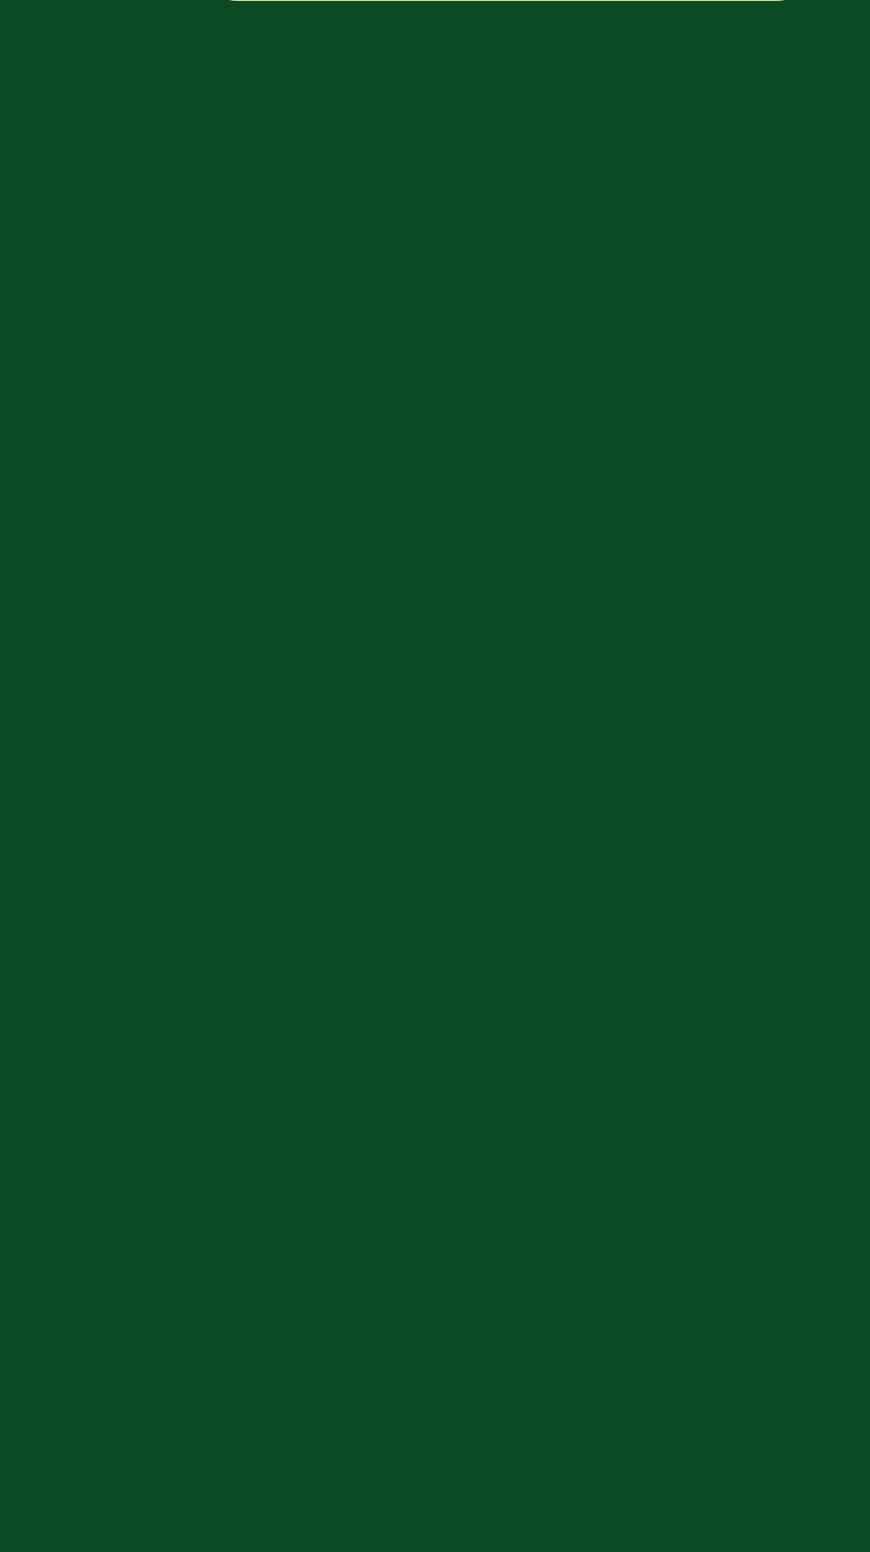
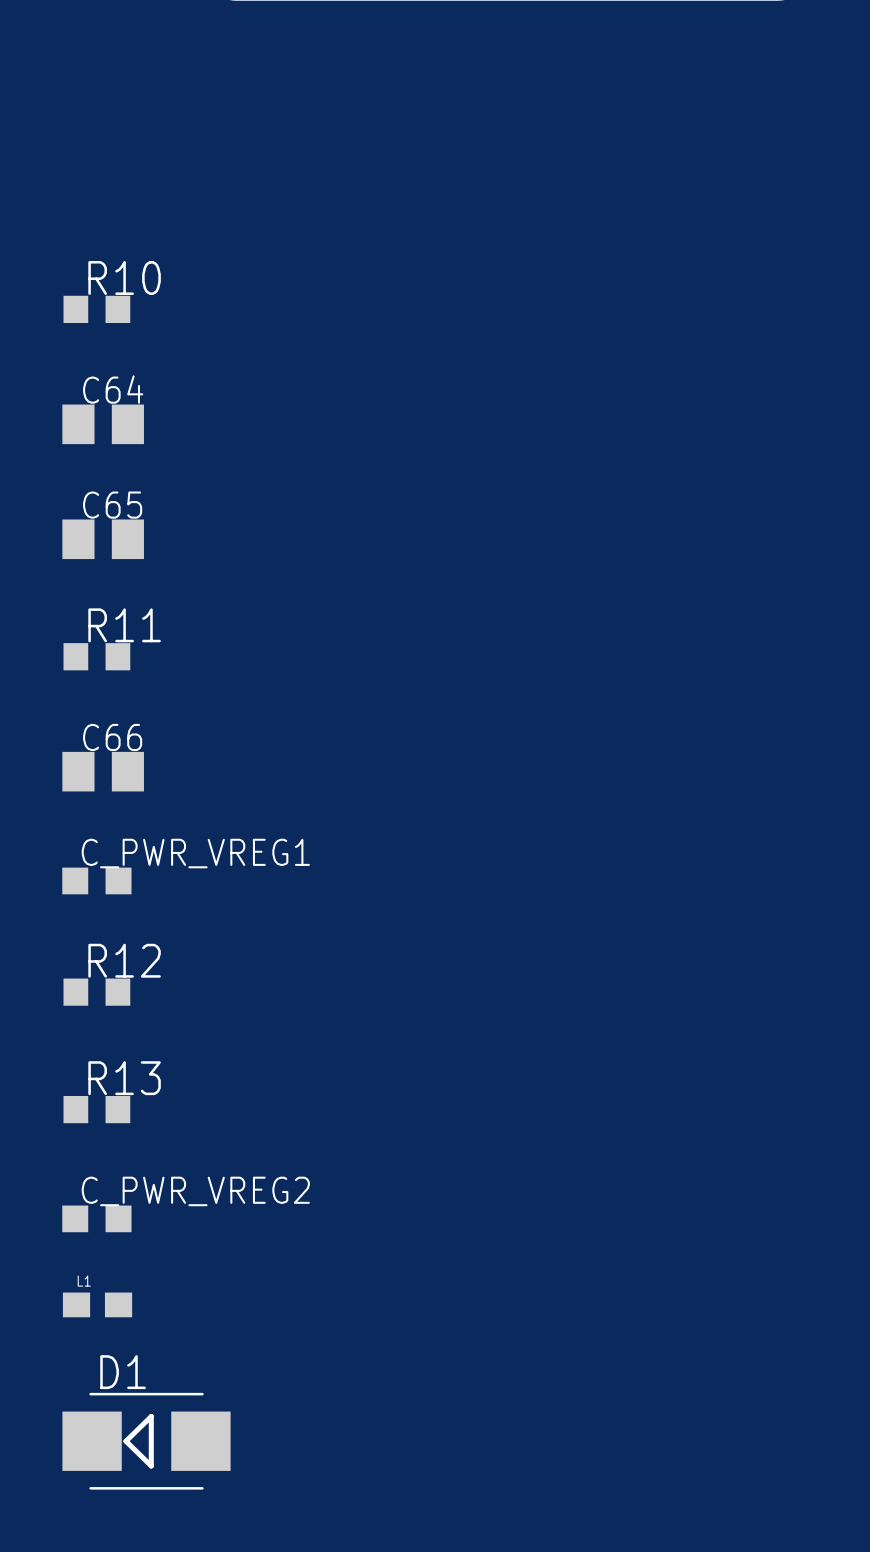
R10: none -> (96, 309)
C64: none -> (103, 424)
C65: none -> (103, 539)
R11: none -> (96, 656)
C66: none -> (103, 771)
C_PWR_VREG1: none -> (96, 880)
R12: none -> (96, 992)
R13: none -> (96, 1109)
C_PWR_VREG2: none -> (96, 1218)
L1: none -> (97, 1304)
D1: none -> (146, 1441)

